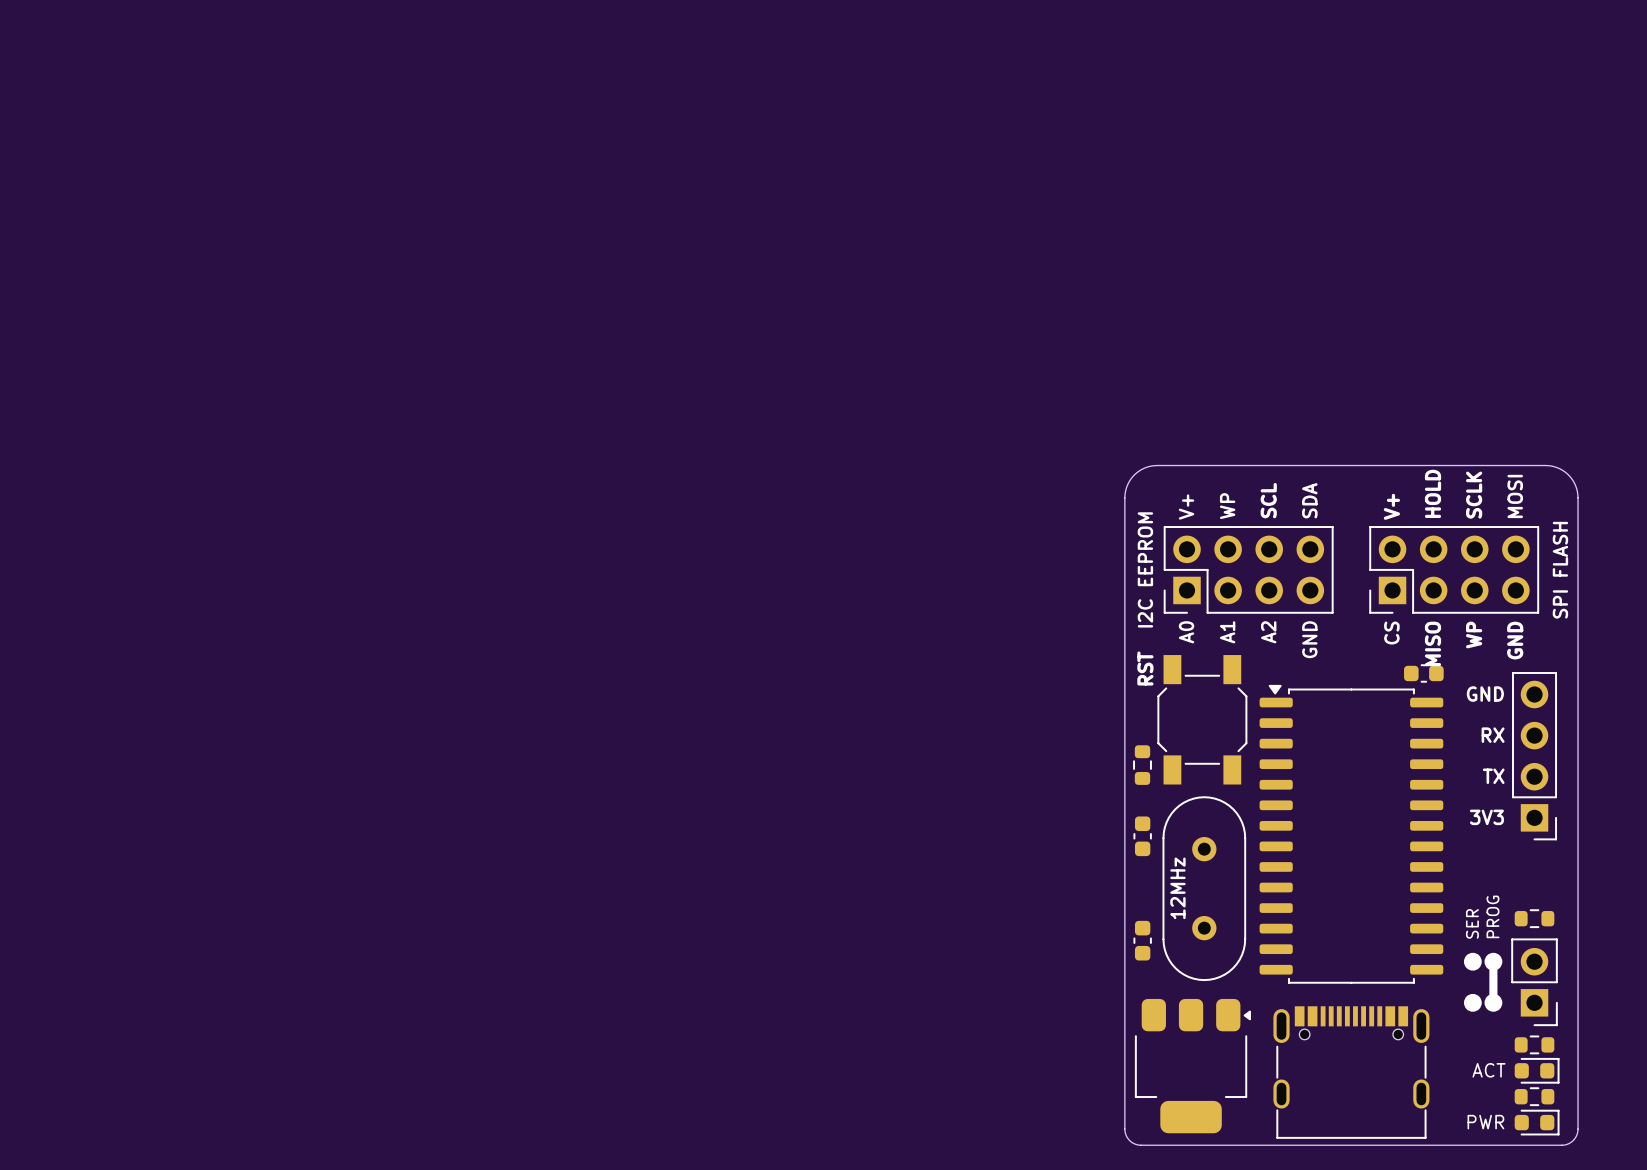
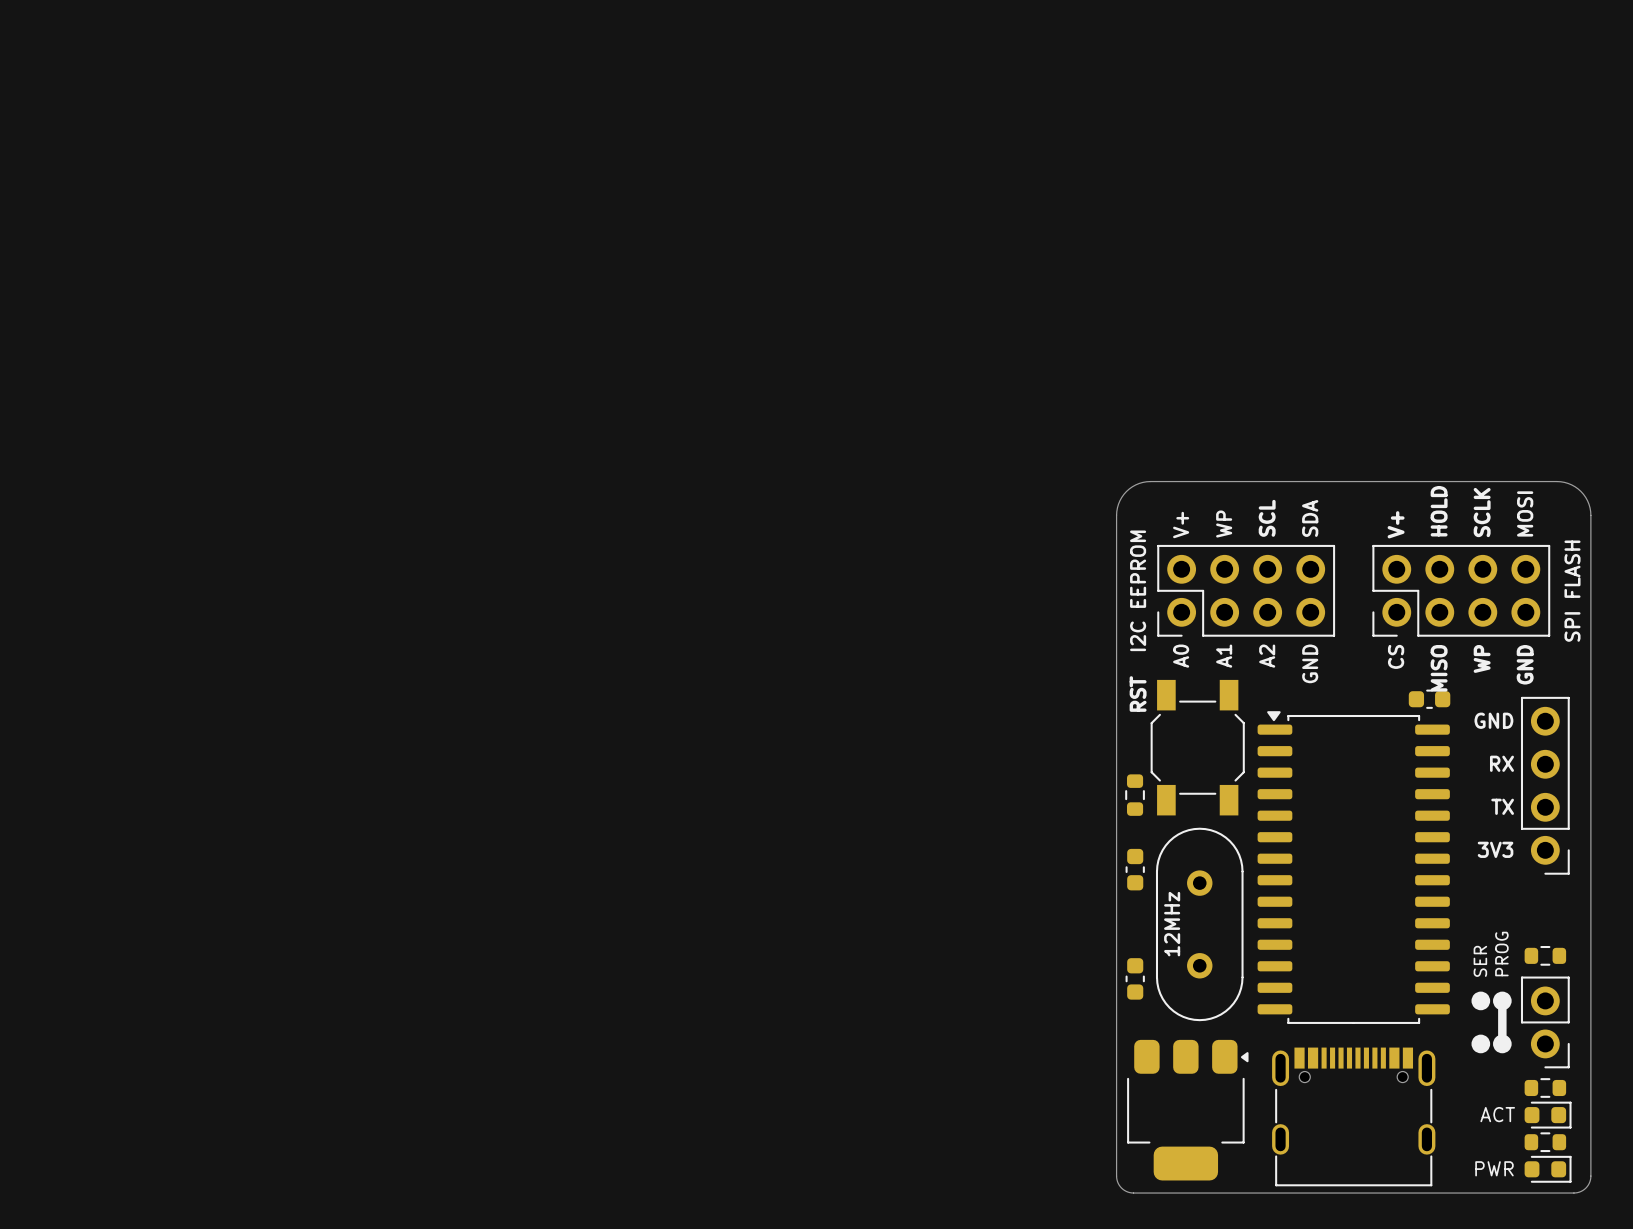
part footprint: [1163, 526, 1334, 614] -> [1157, 544, 1336, 637]
part footprint: [1369, 526, 1540, 614] -> [1372, 544, 1551, 637]
part footprint: [1512, 672, 1558, 841] -> [1520, 696, 1570, 875]
part footprint: [1511, 938, 1558, 1027] -> [1520, 976, 1570, 1069]

